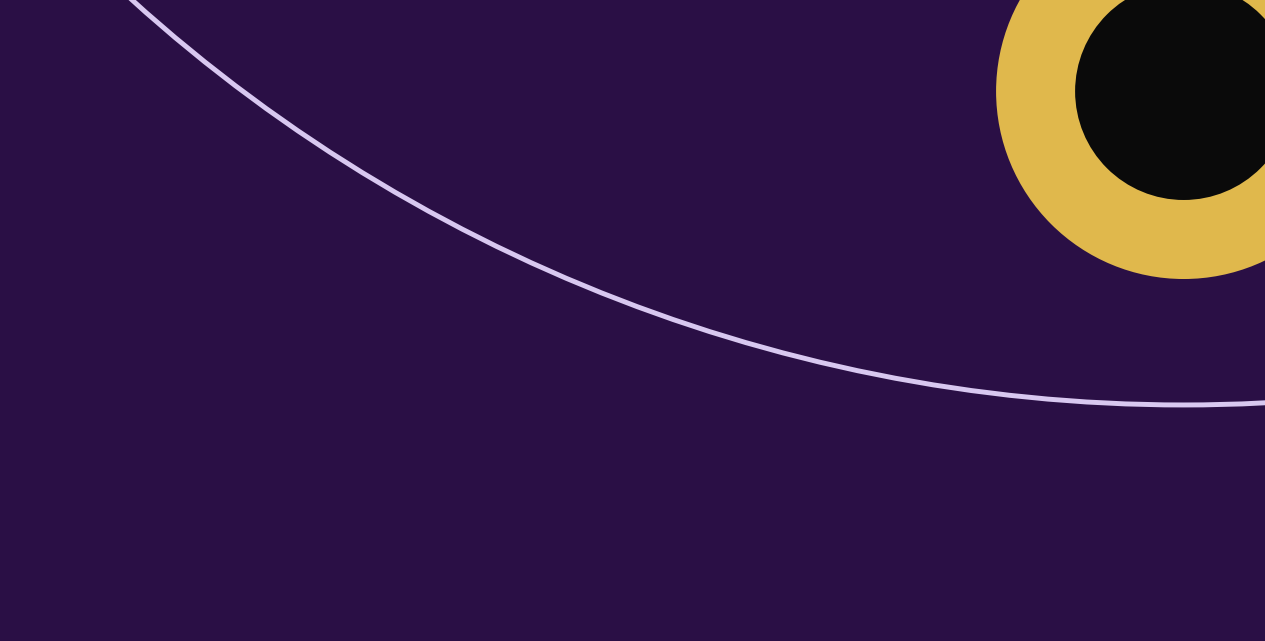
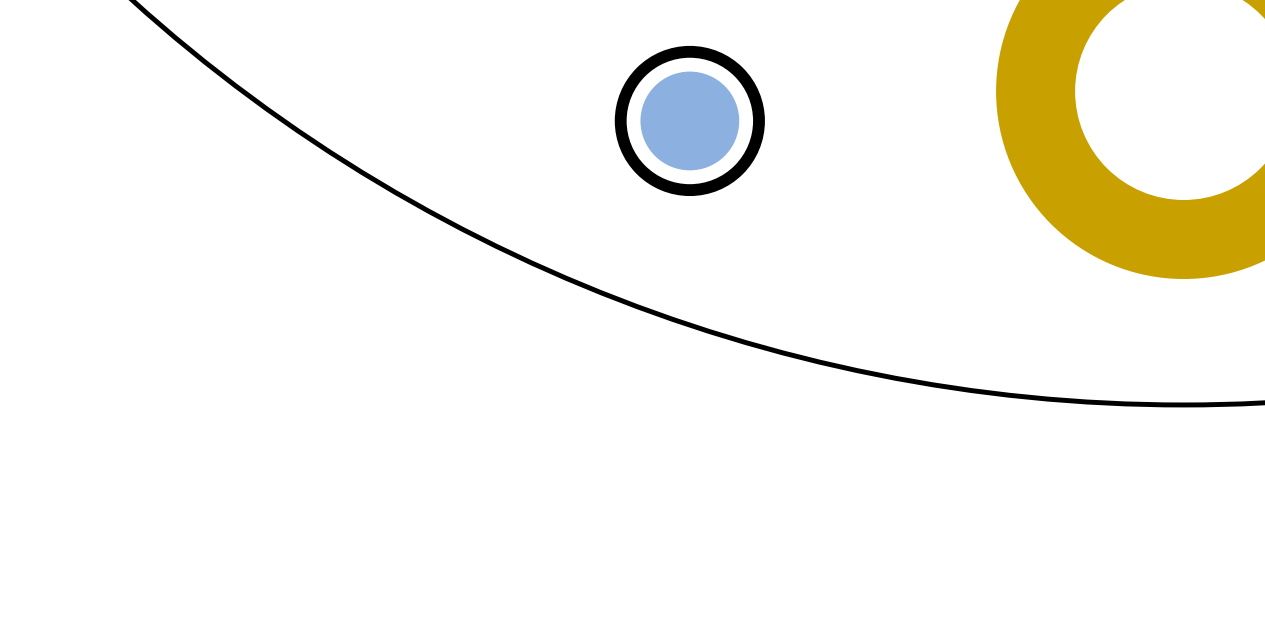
part: none -> (689, 120)

